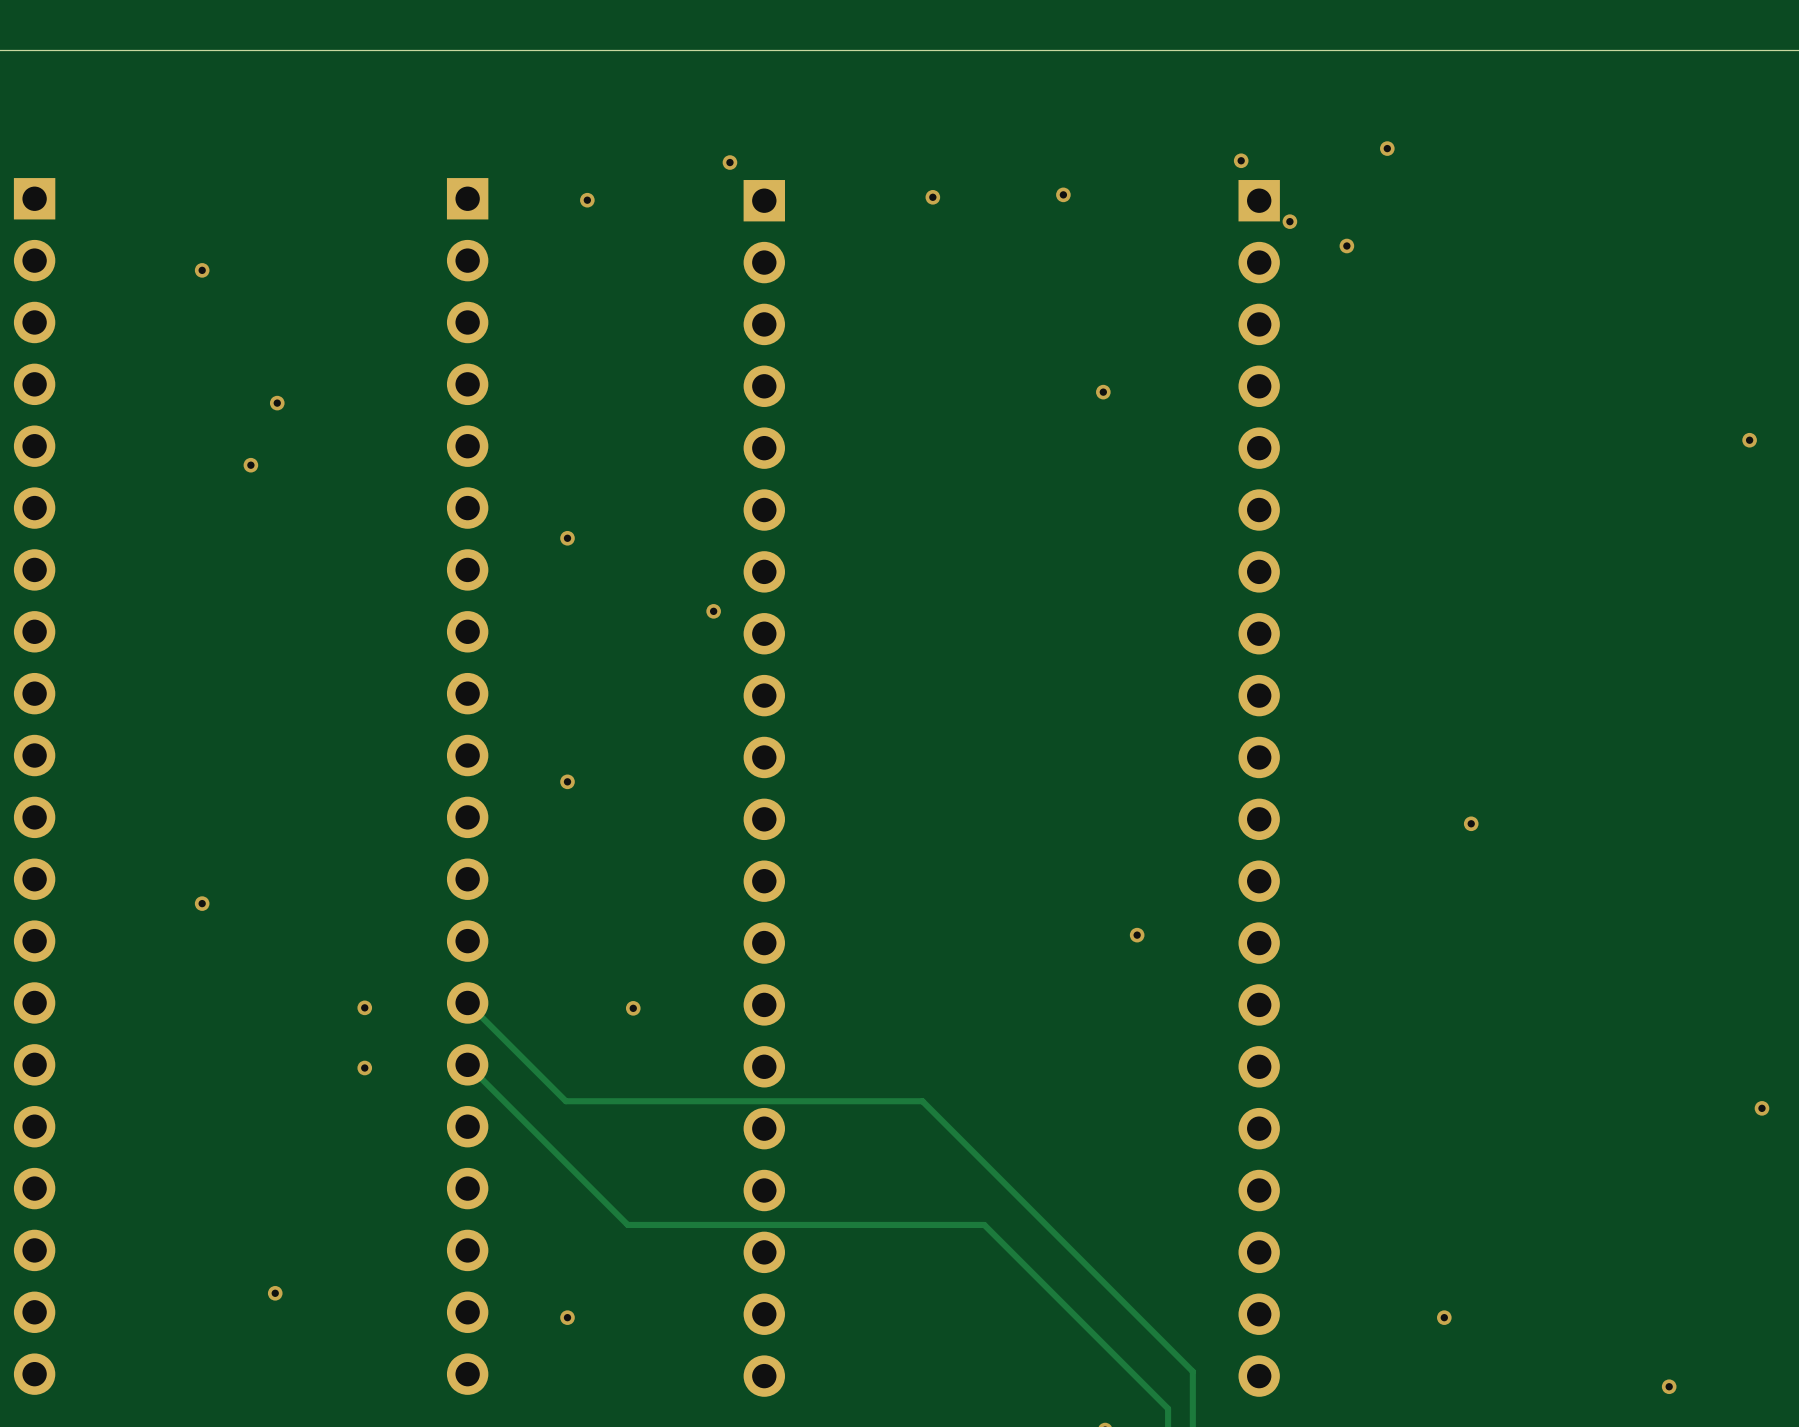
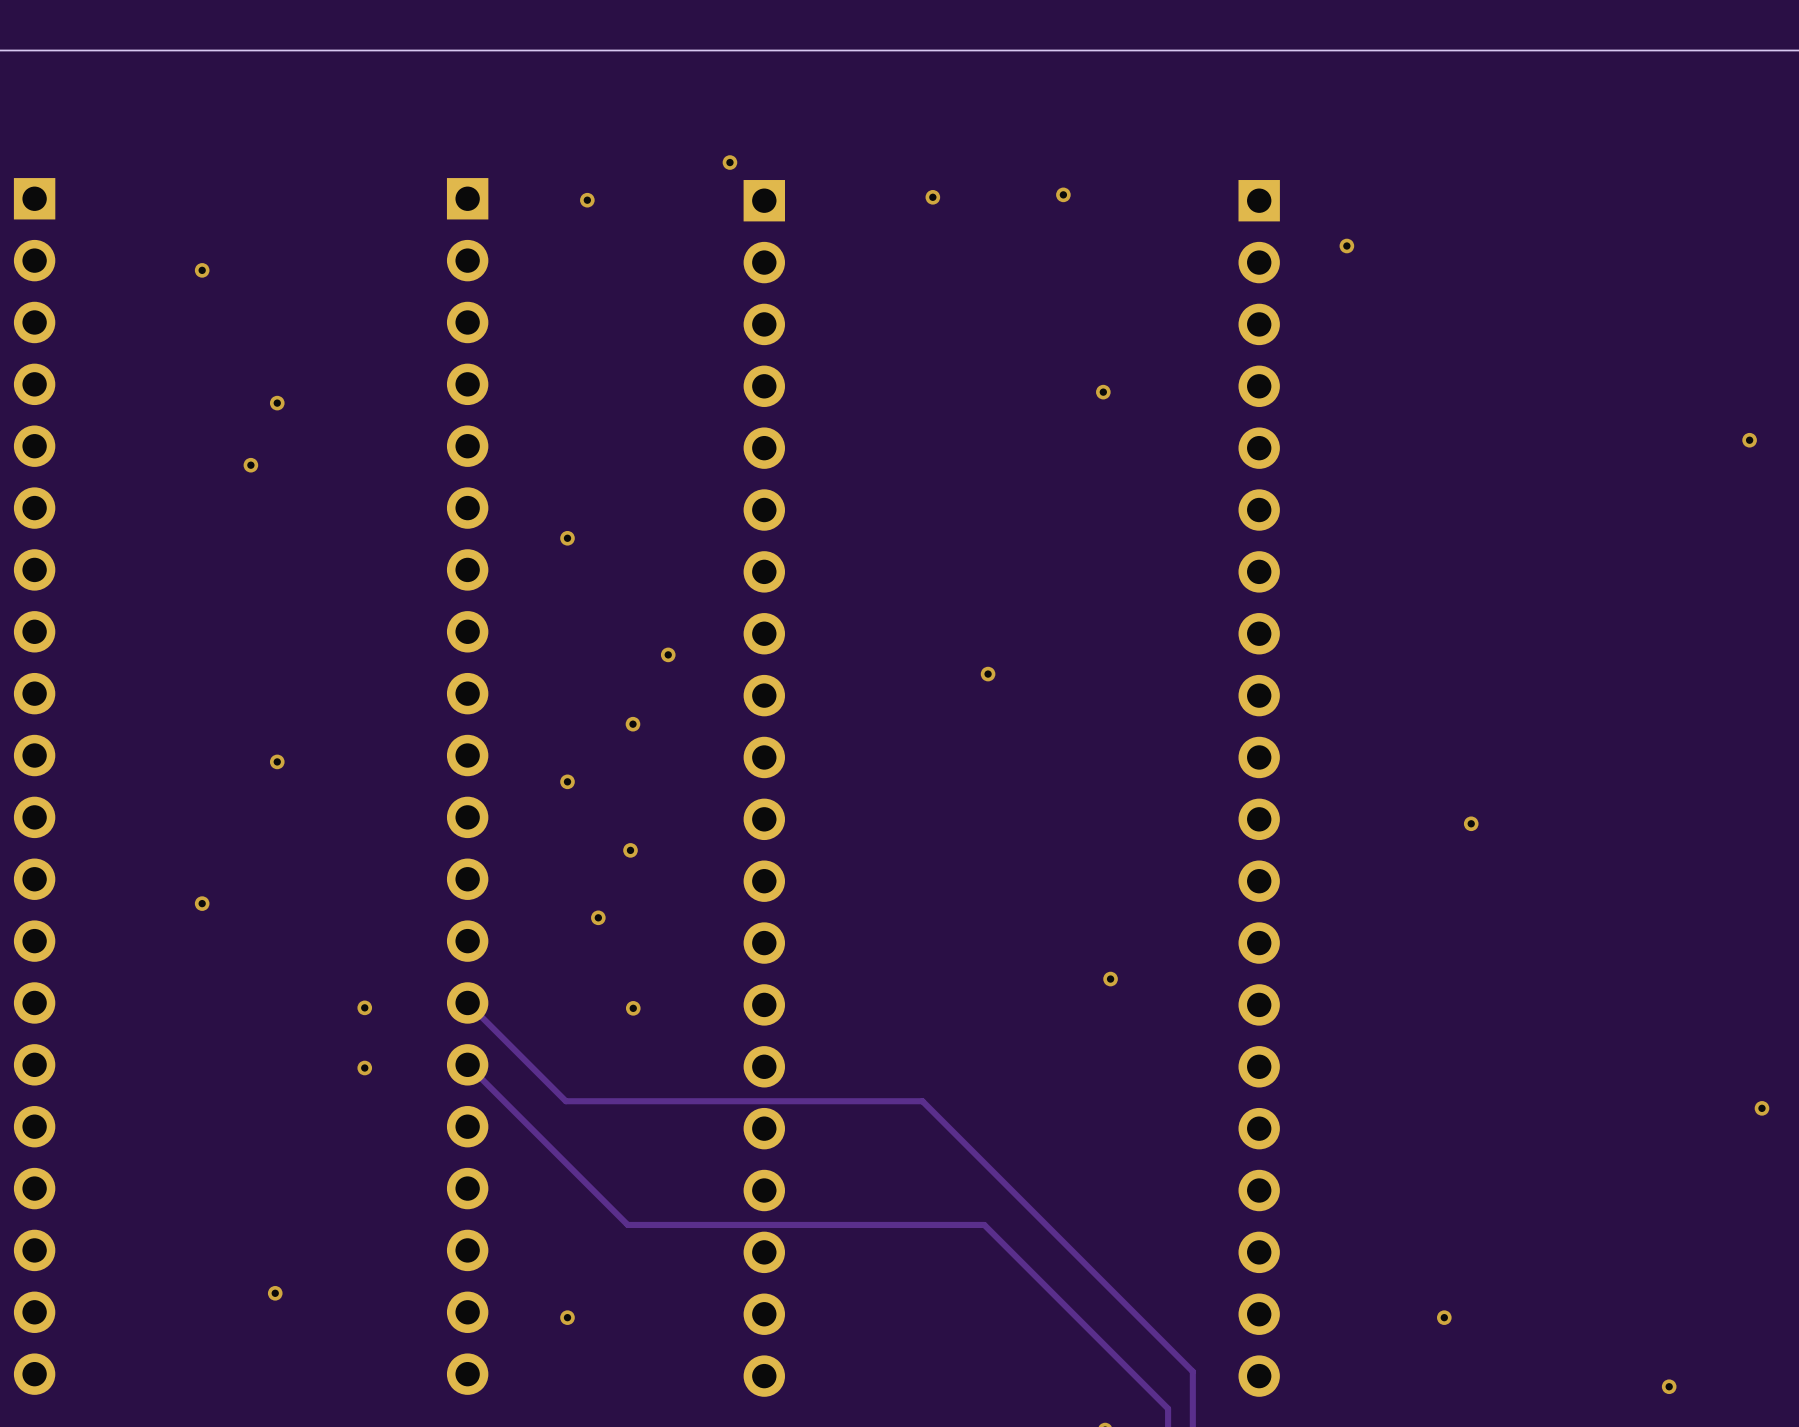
via: (1387, 148) -> none
via: (1241, 160) -> none
via: (1289, 221) -> none
via position: (713, 611) -> (668, 654)
via: none -> (988, 674)
via: none -> (632, 724)
via: none -> (277, 761)
via: none -> (630, 850)
via: none -> (598, 917)
via position: (1137, 935) -> (1110, 979)

